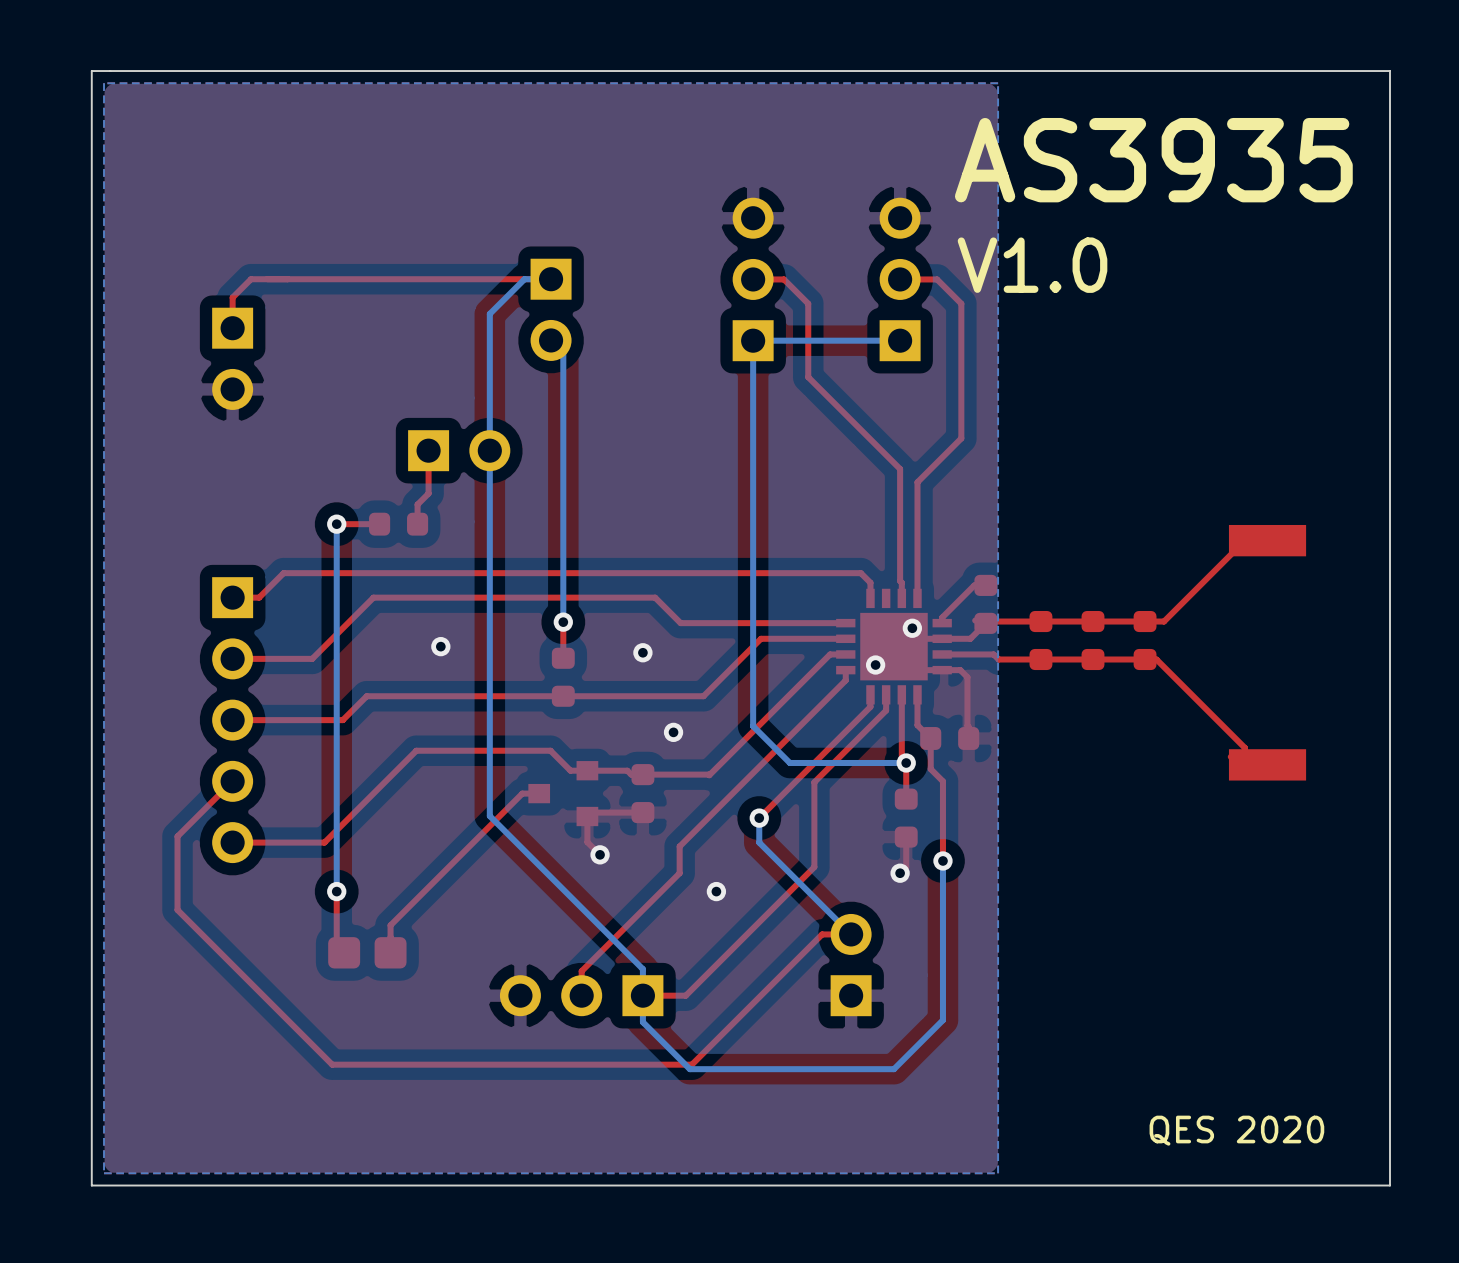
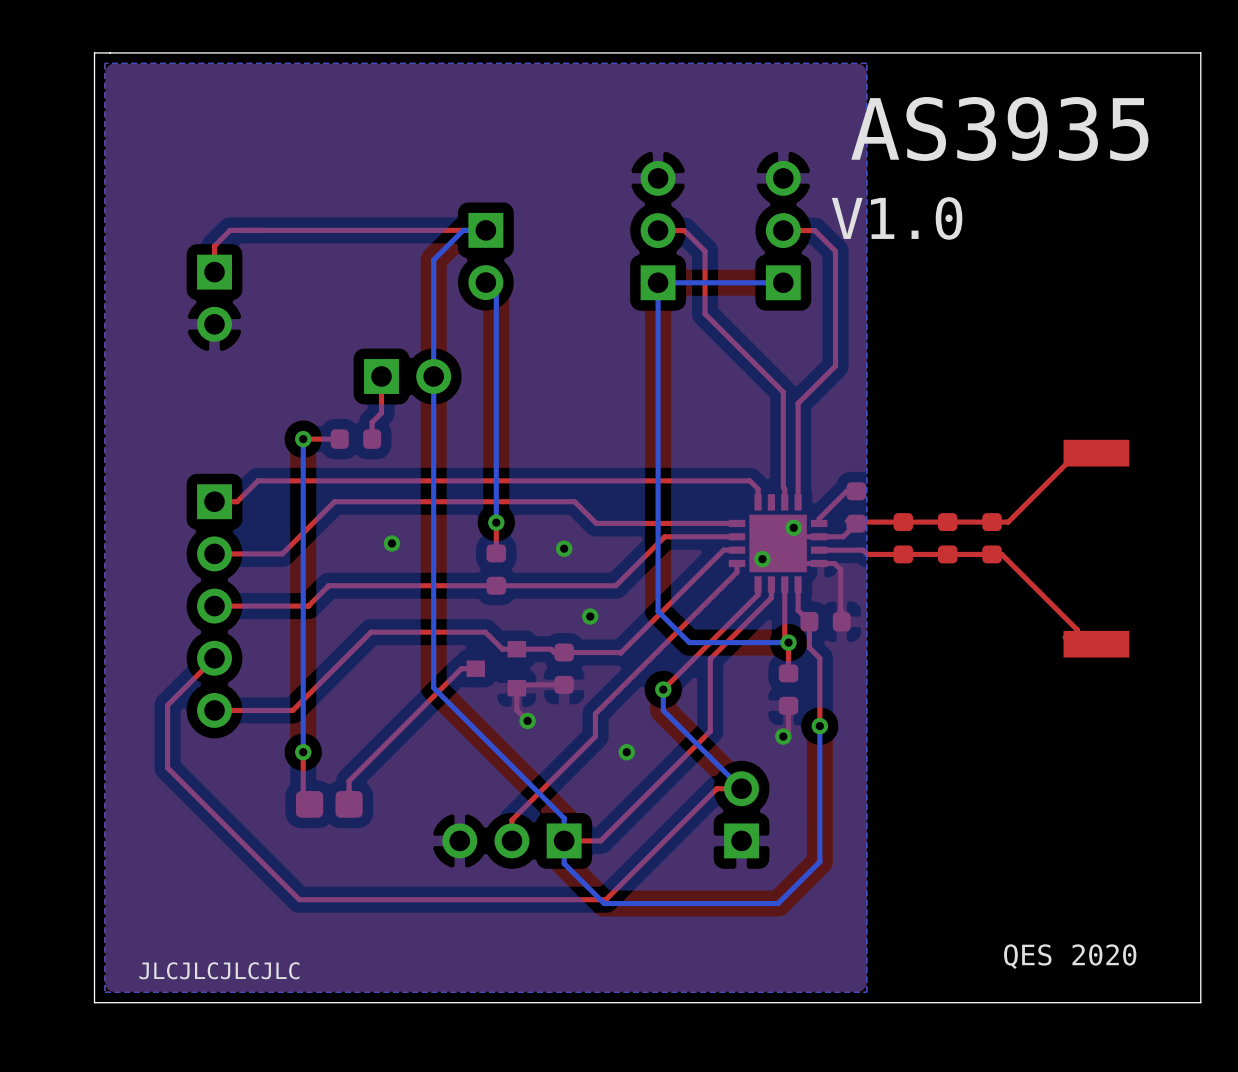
text: none -> JLCJLCJLCJLC (219, 970)

